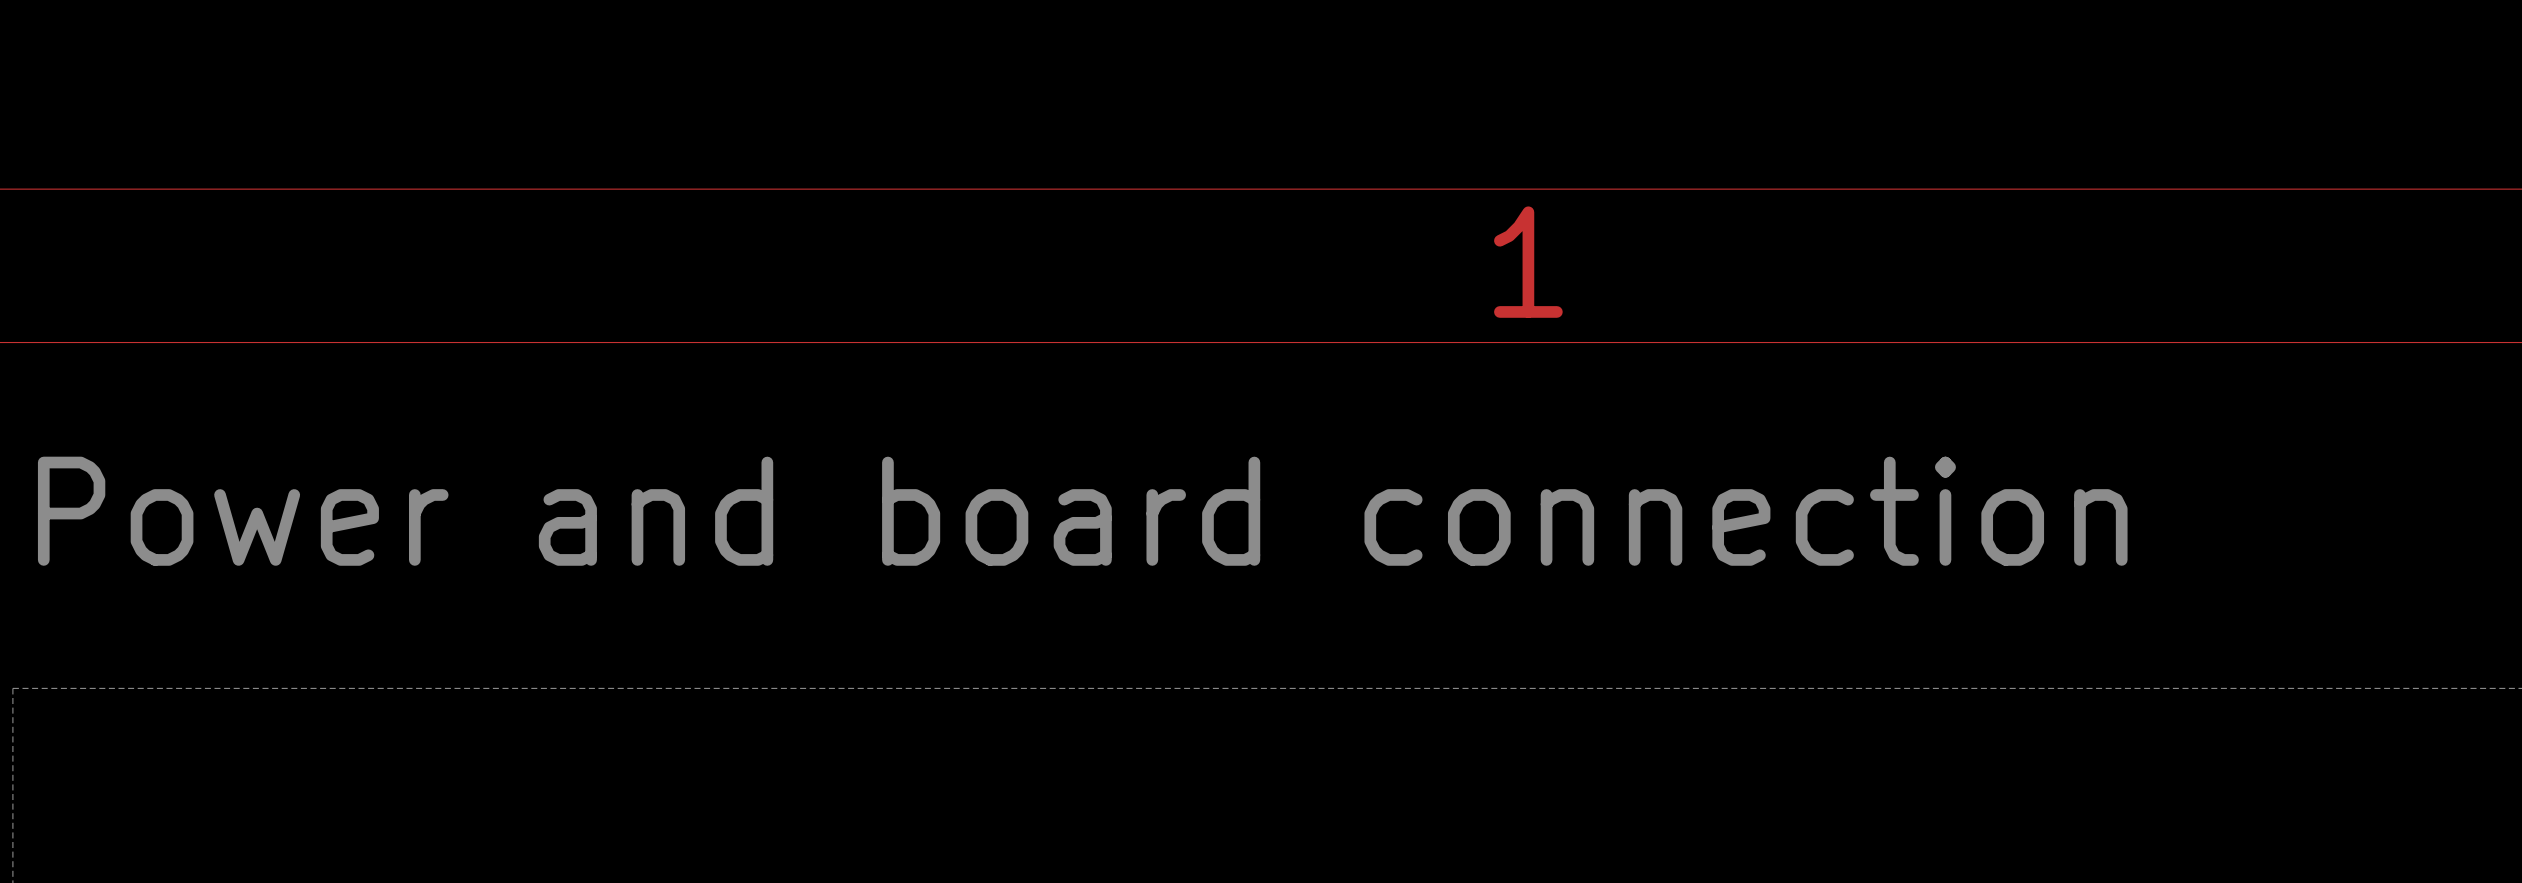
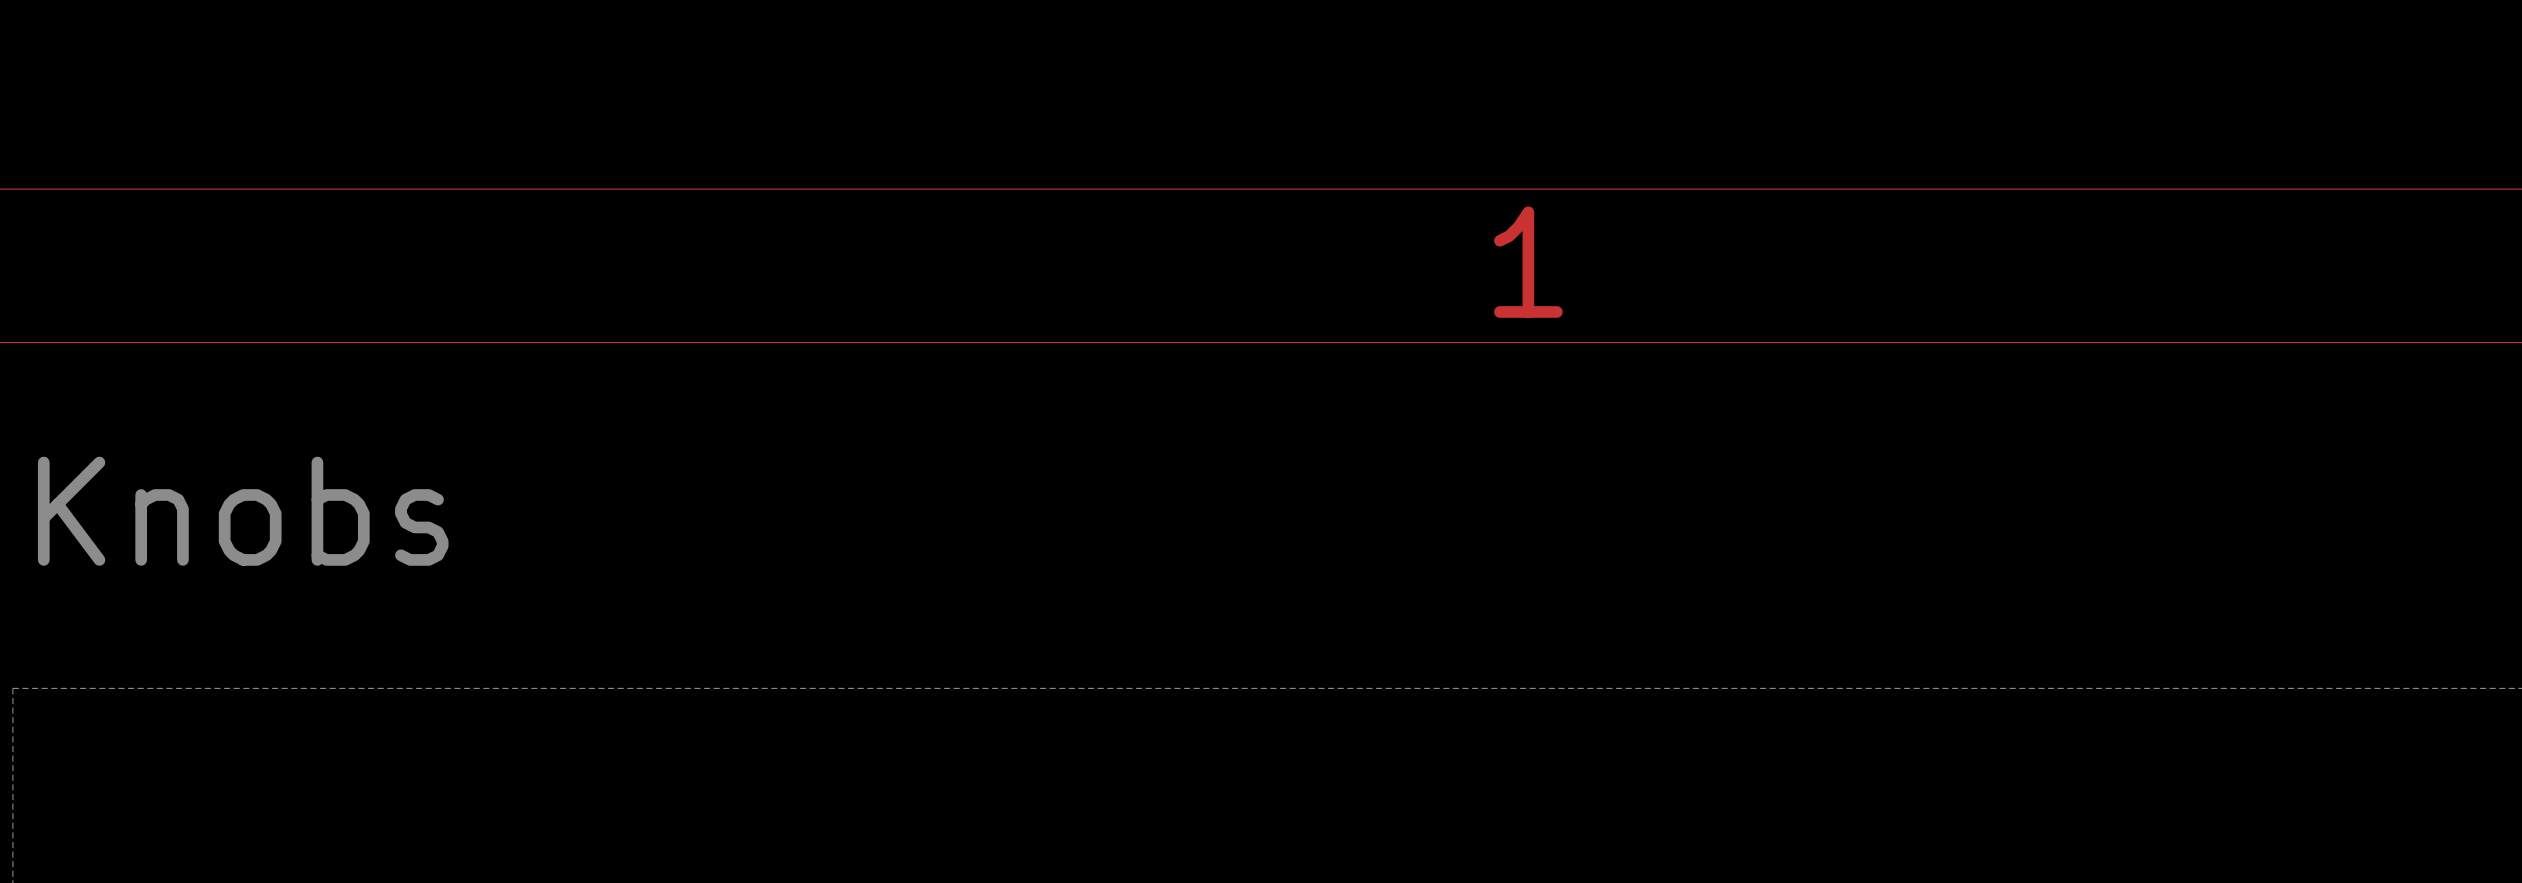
text: Power and board connection (1082, 511) -> Knobs (243, 511)

